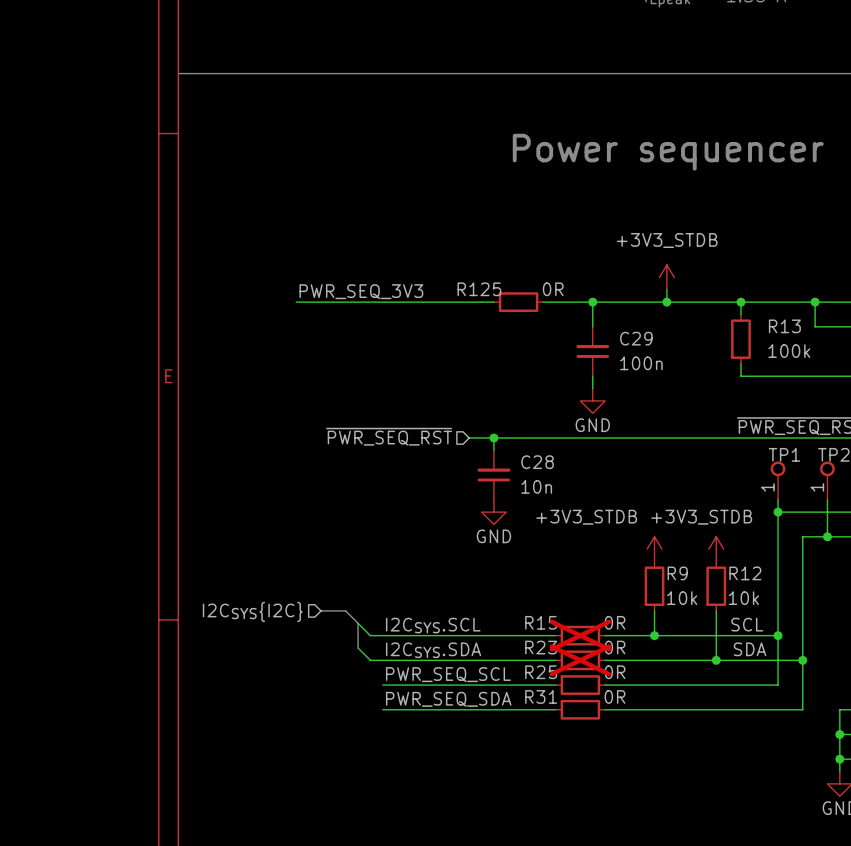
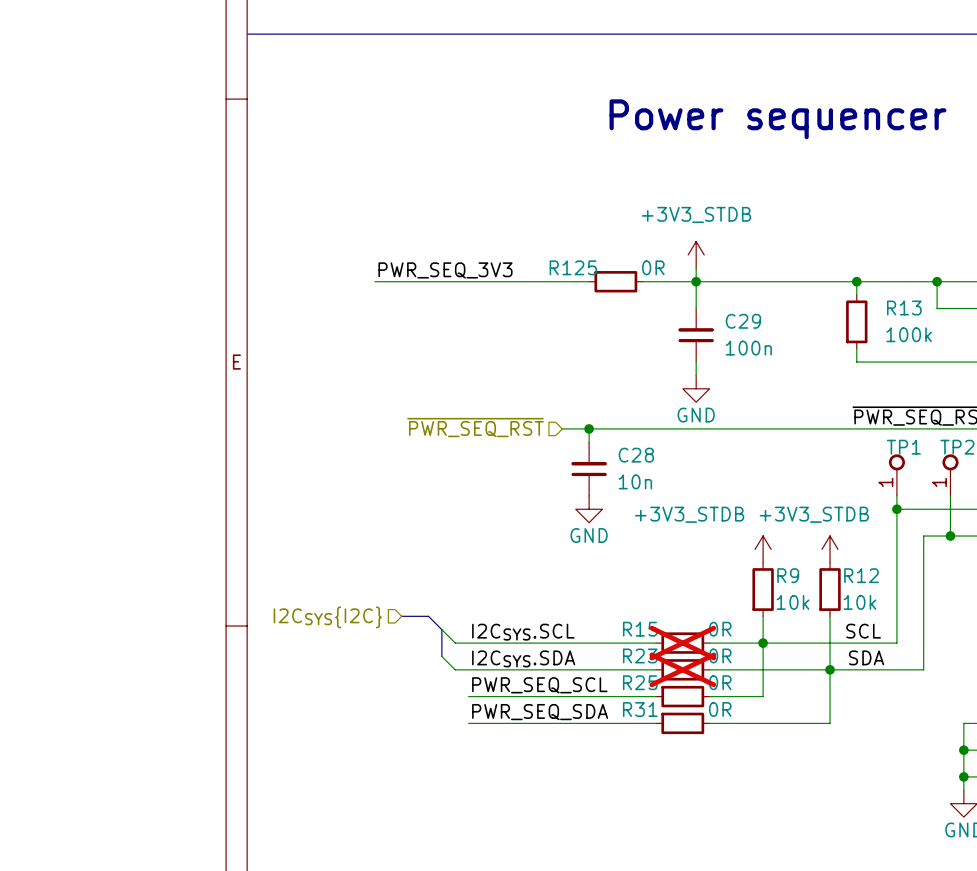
power symbol position: +3V3_STDB (666, 277) -> +3V3_STDB (696, 254)
wire: (666, 289) (666, 302) -> (696, 268) (696, 281)
junction: (666, 302) -> none
wire: (778, 635) (778, 685) (654, 685) -> (763, 643) (763, 696)
junction: (778, 635) -> none
wire: (802, 660) (802, 709) (716, 709) -> (830, 669) (830, 723)
junction: (802, 660) -> none

